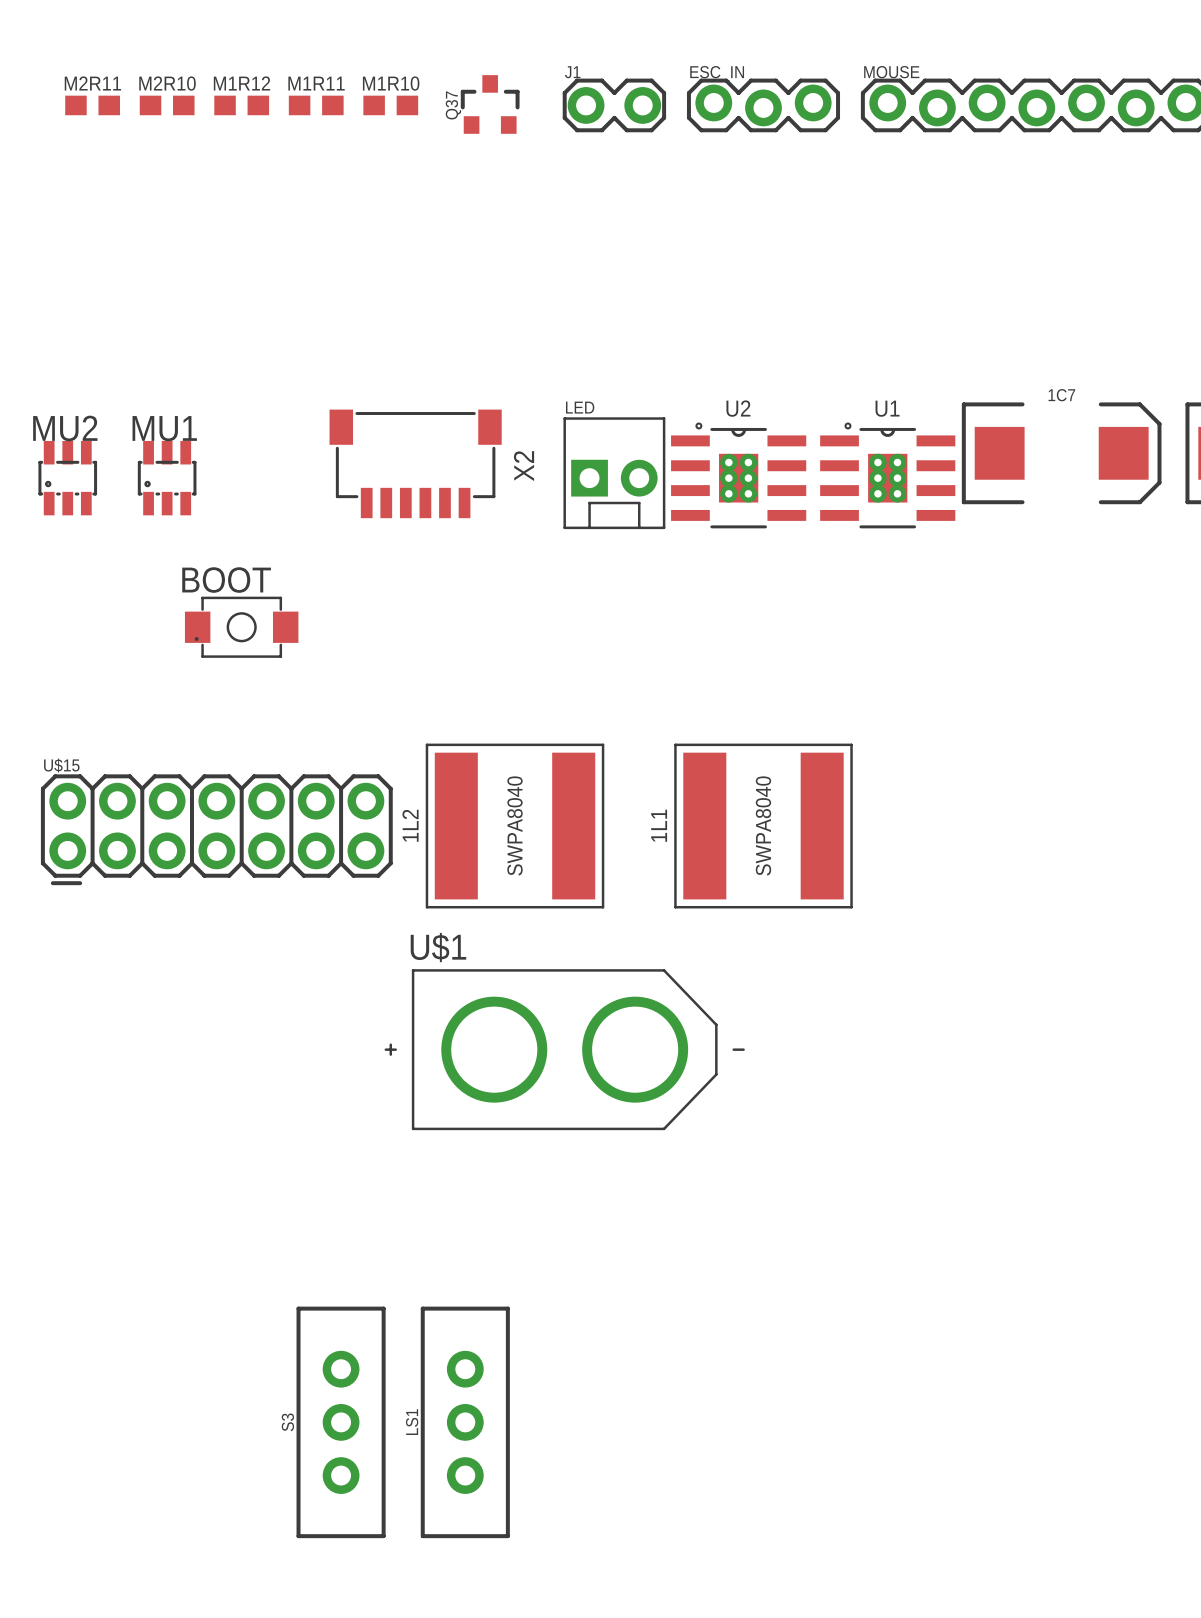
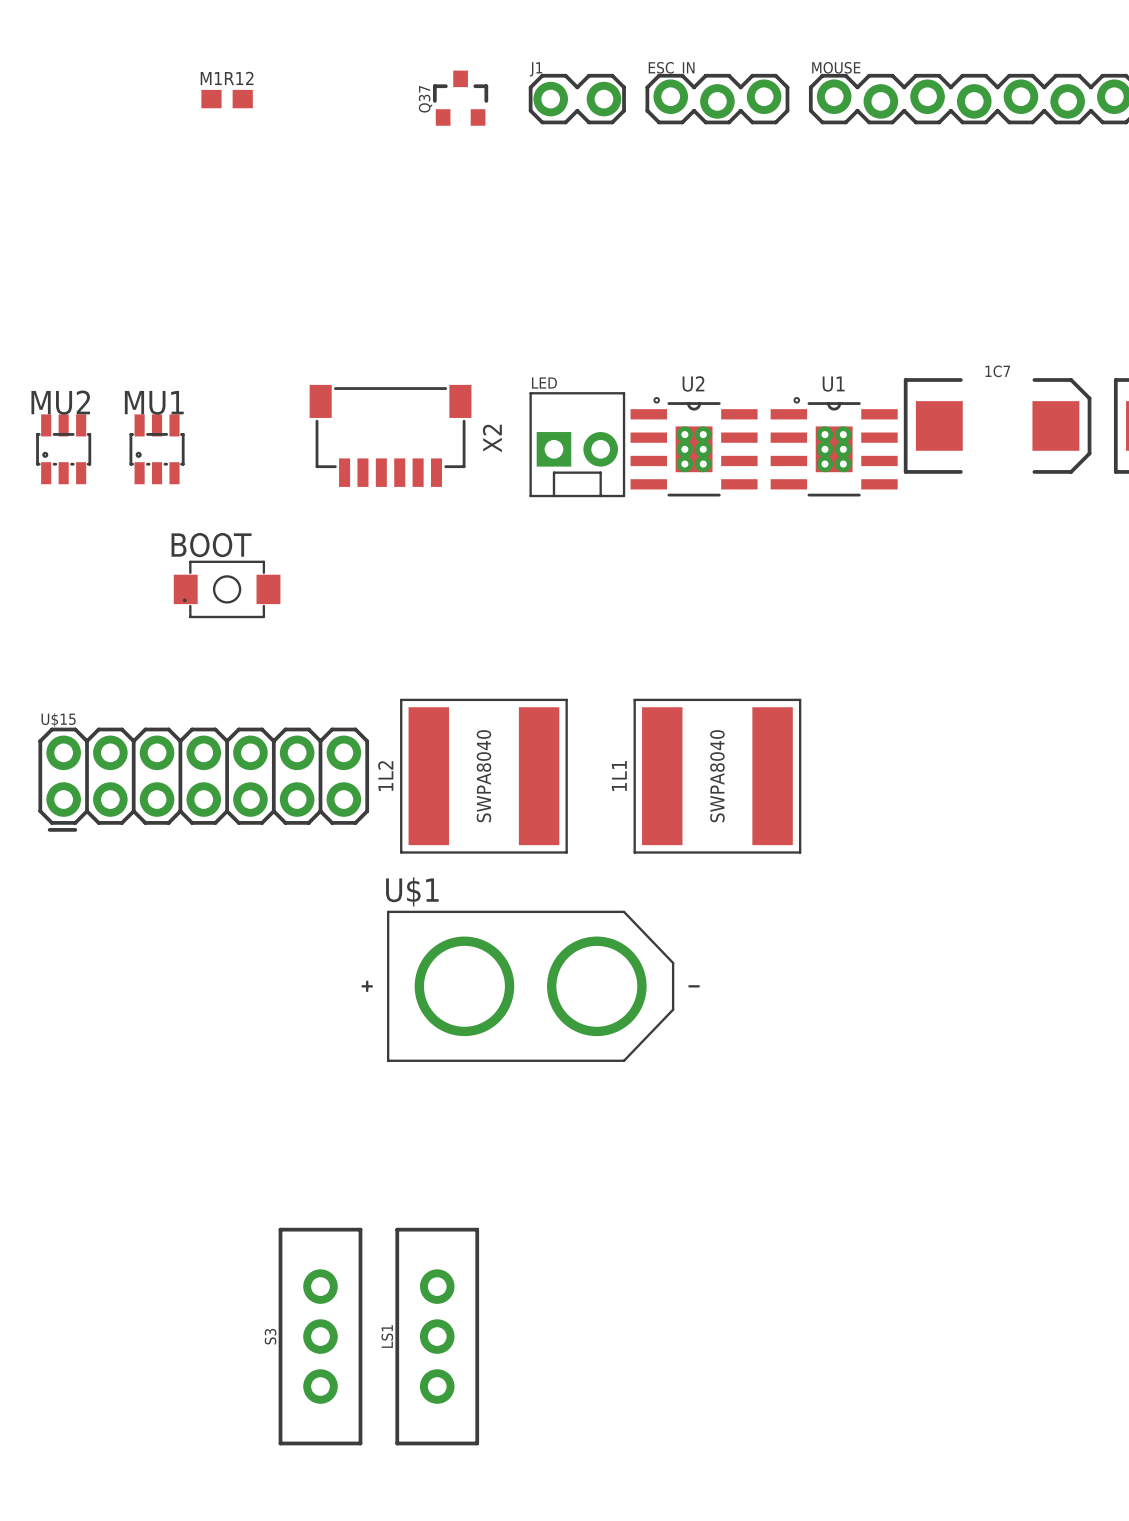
M2R11: (92, 105) -> none
M2R10: (167, 105) -> none
M1R11: (316, 105) -> none
M1R10: (390, 105) -> none

